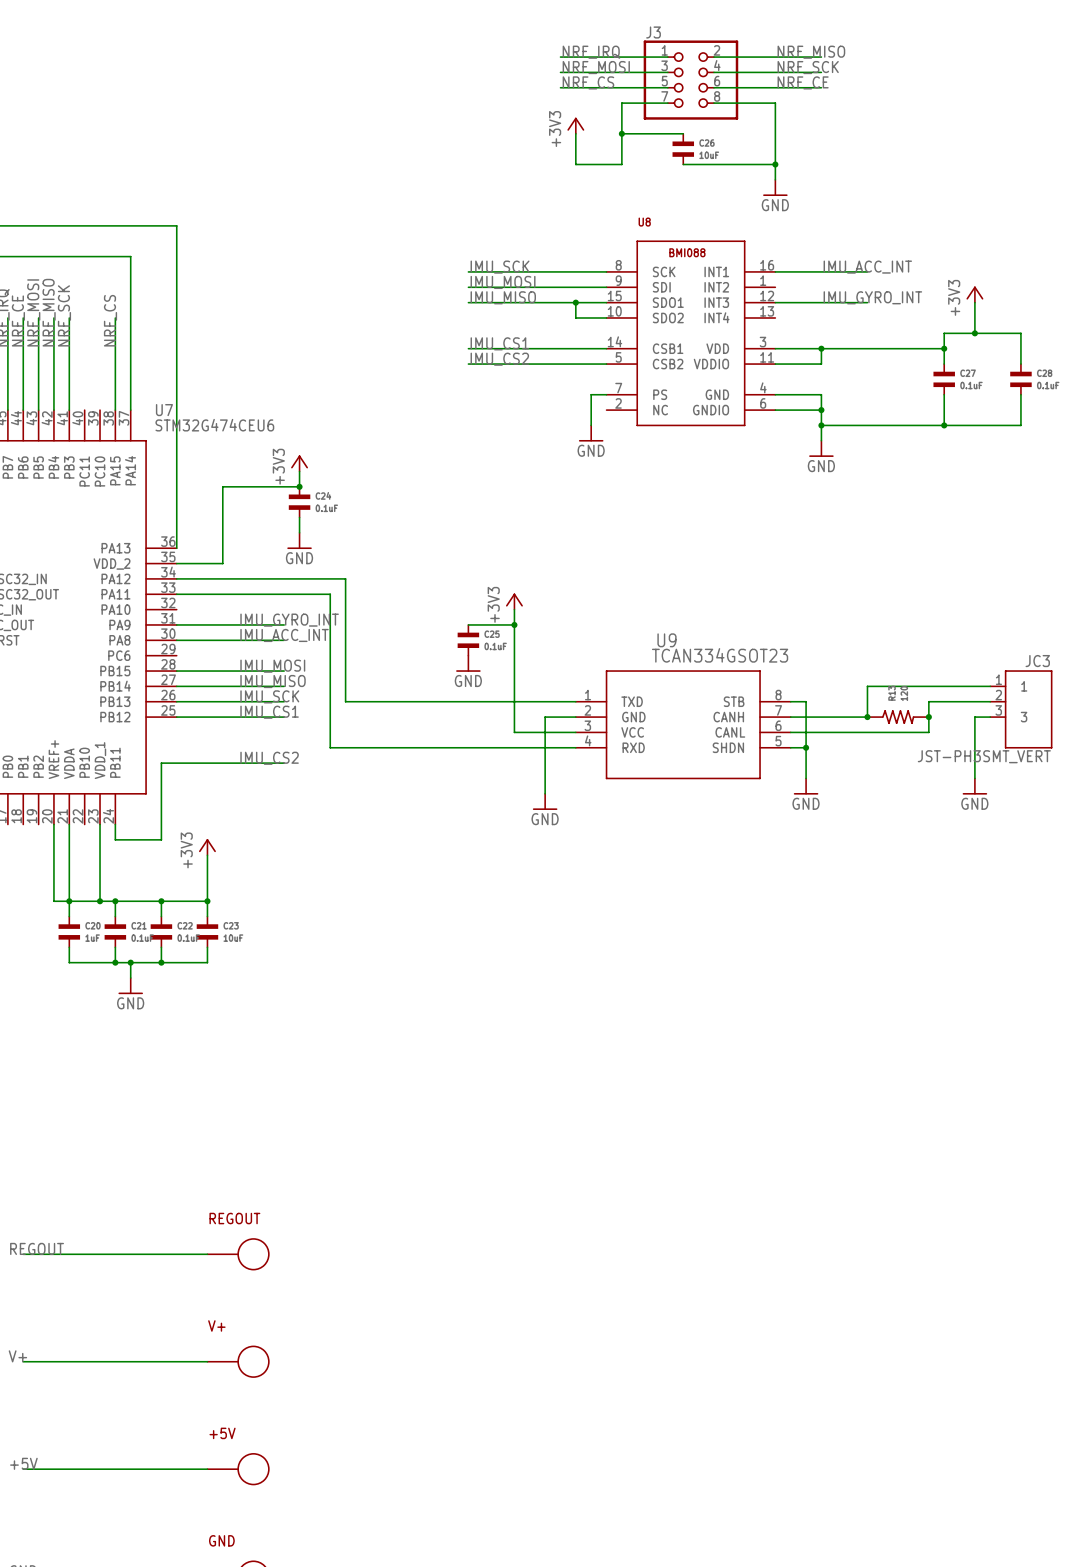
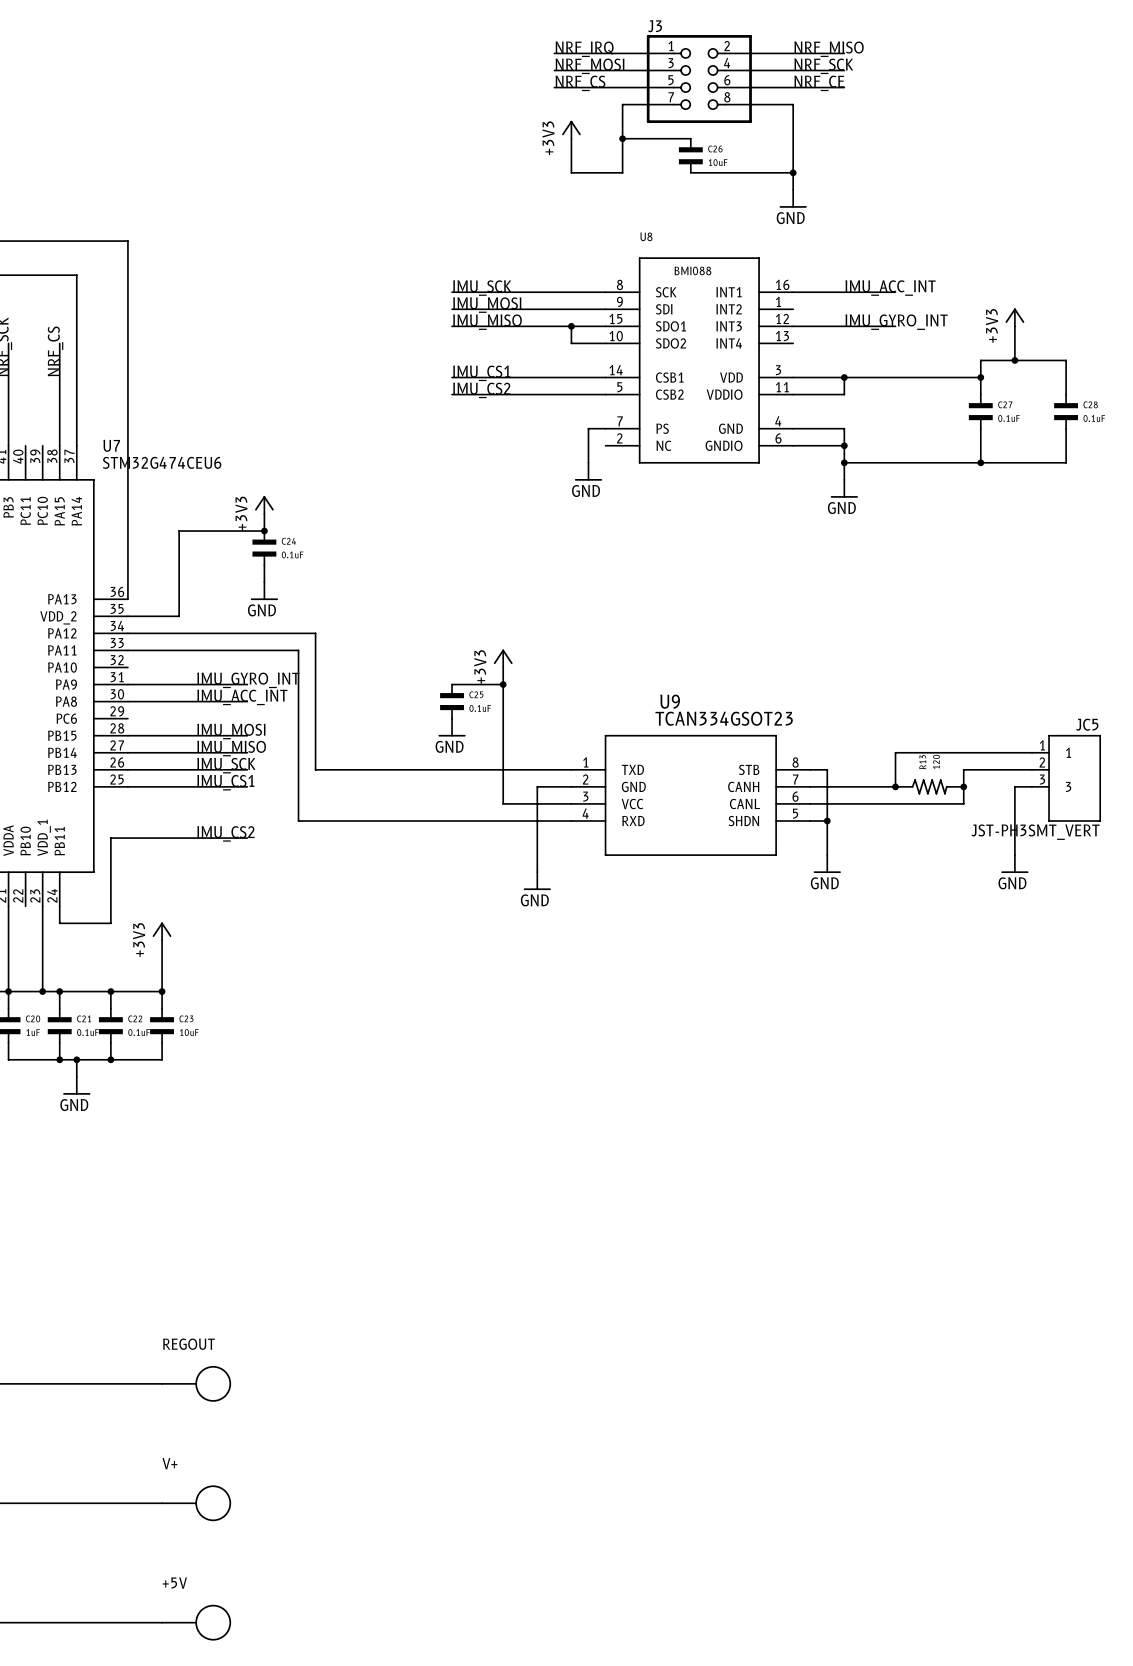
JC3 name: JC3 (1037, 661) -> JC5 (1087, 724)

